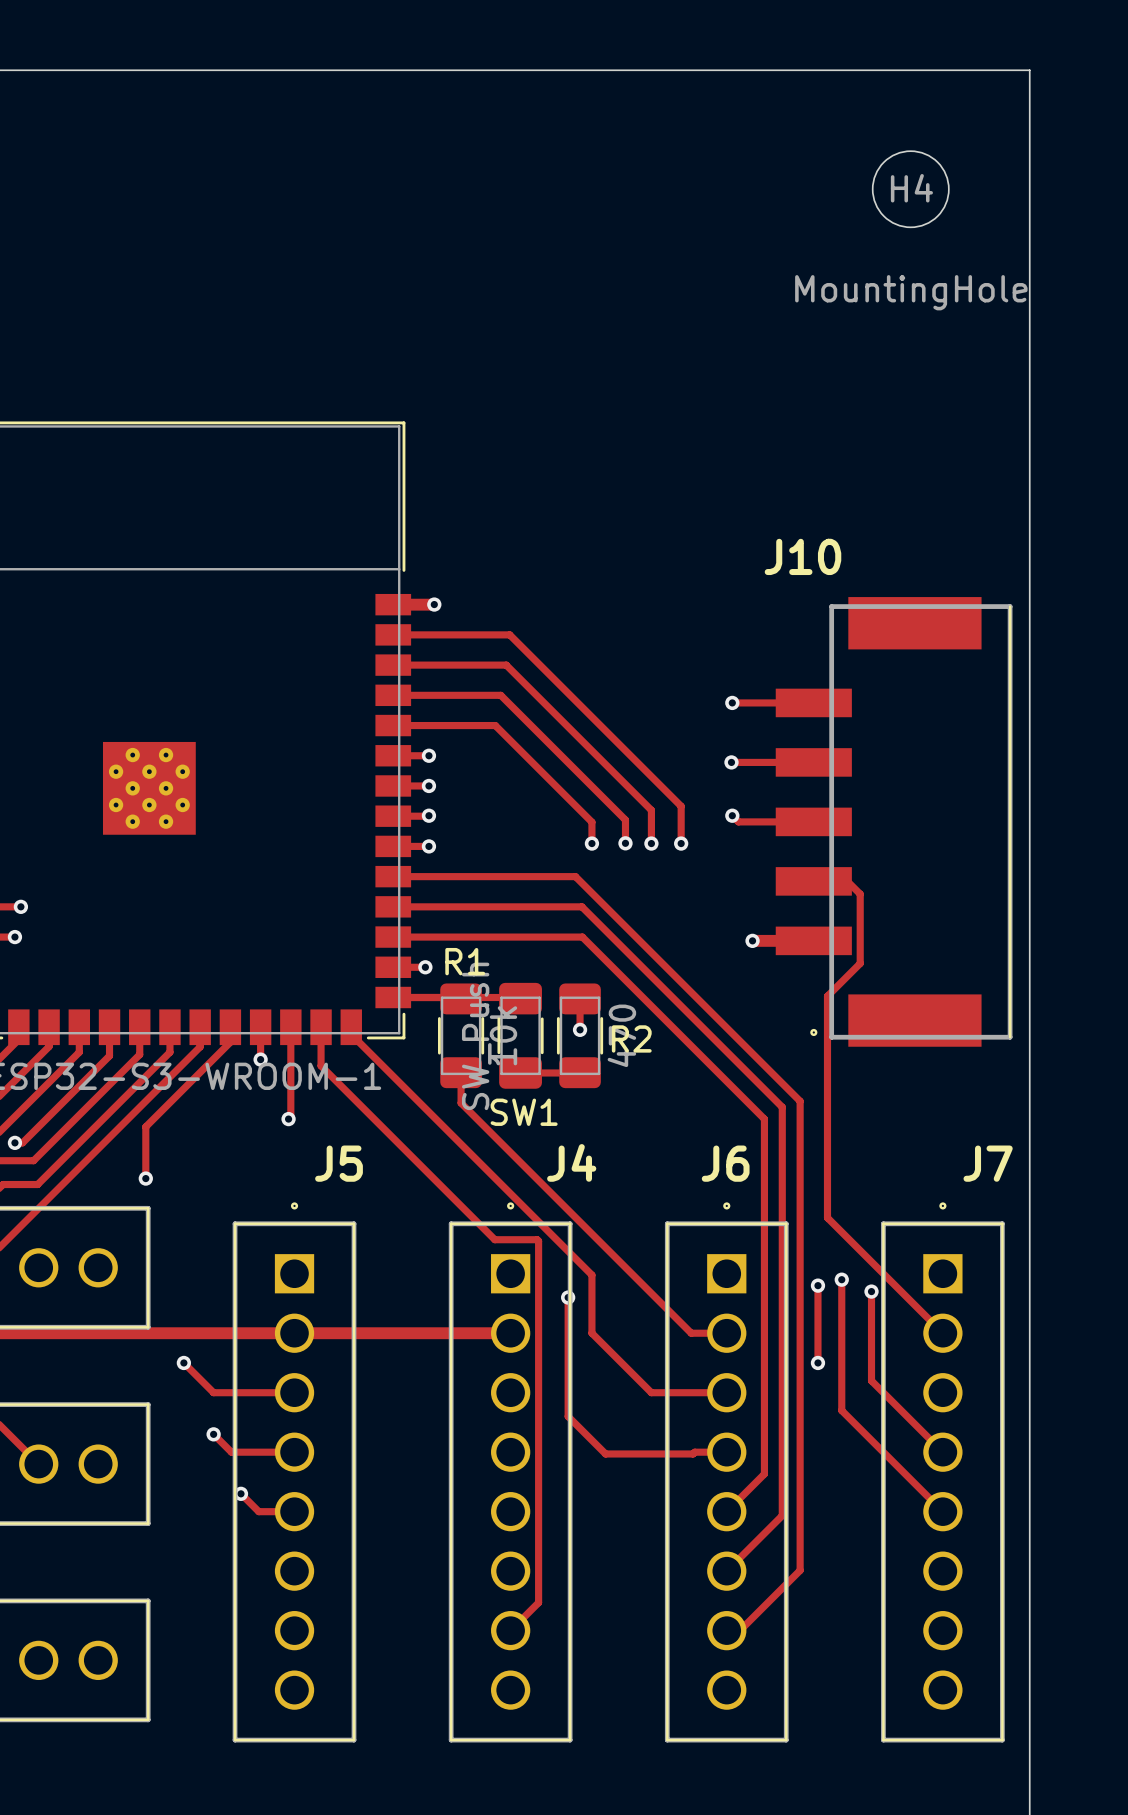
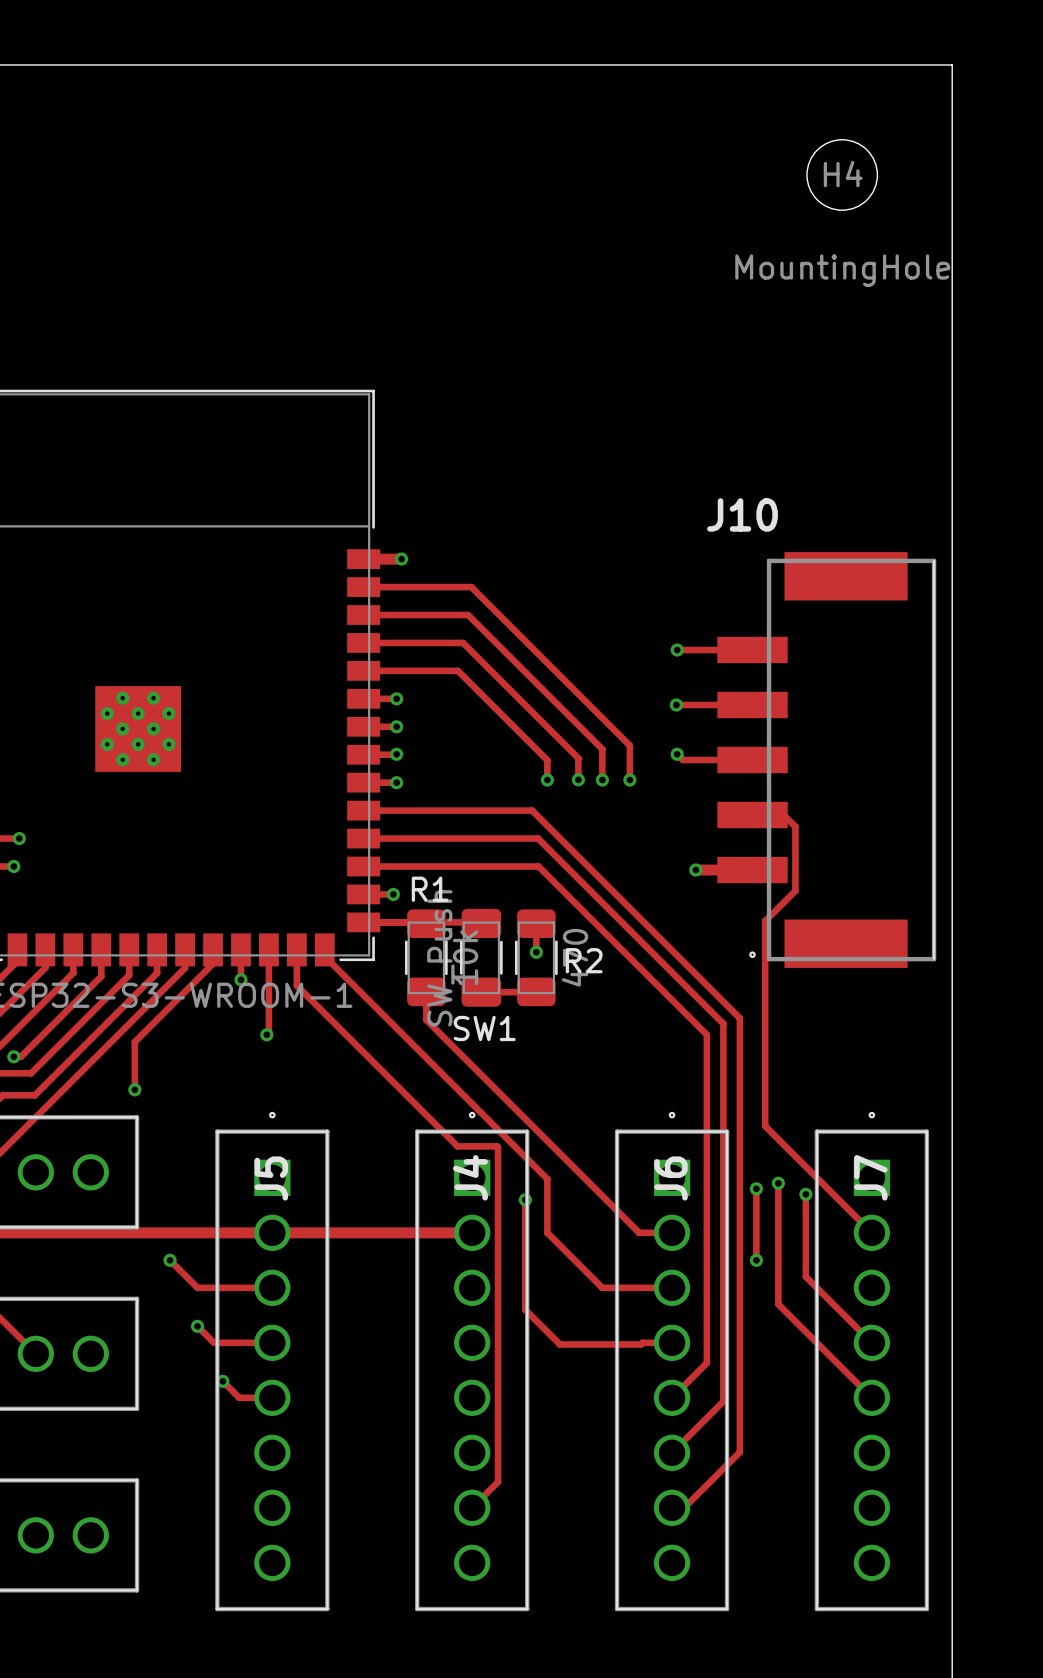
J4 name rotation: 0° (571, 1162) -> 90° counterclockwise (470, 1177)
J4 name position: J4 (571, 1162) -> J4 (470, 1177)
J5 name rotation: 0° (339, 1163) -> 90° counterclockwise (271, 1178)
J5 name position: J5 (339, 1163) -> J5 (271, 1178)
J6 name rotation: 0° (725, 1163) -> 90° counterclockwise (670, 1178)
J6 name position: J6 (725, 1163) -> J6 (670, 1178)
J7 name rotation: 0° (988, 1163) -> 90° counterclockwise (870, 1177)
J7 name position: J7 (988, 1163) -> J7 (870, 1177)

